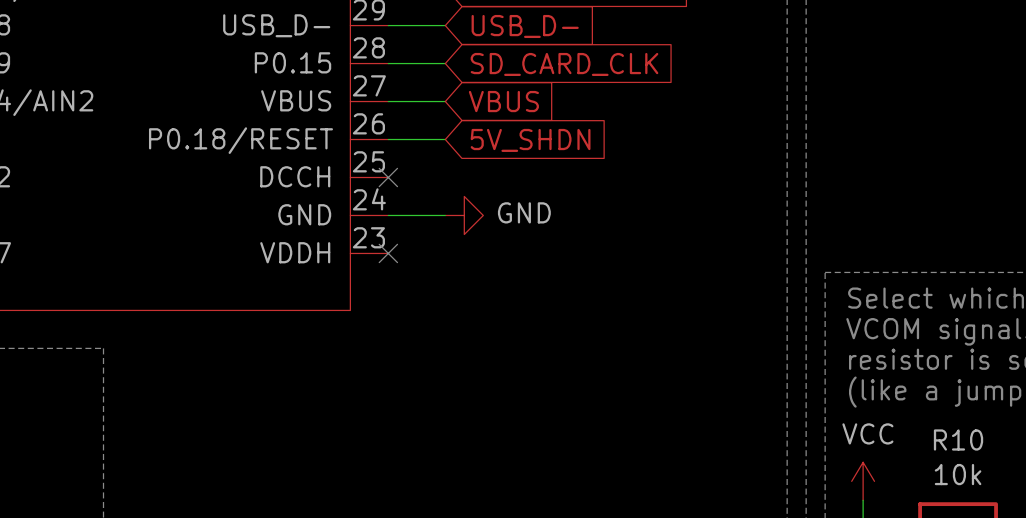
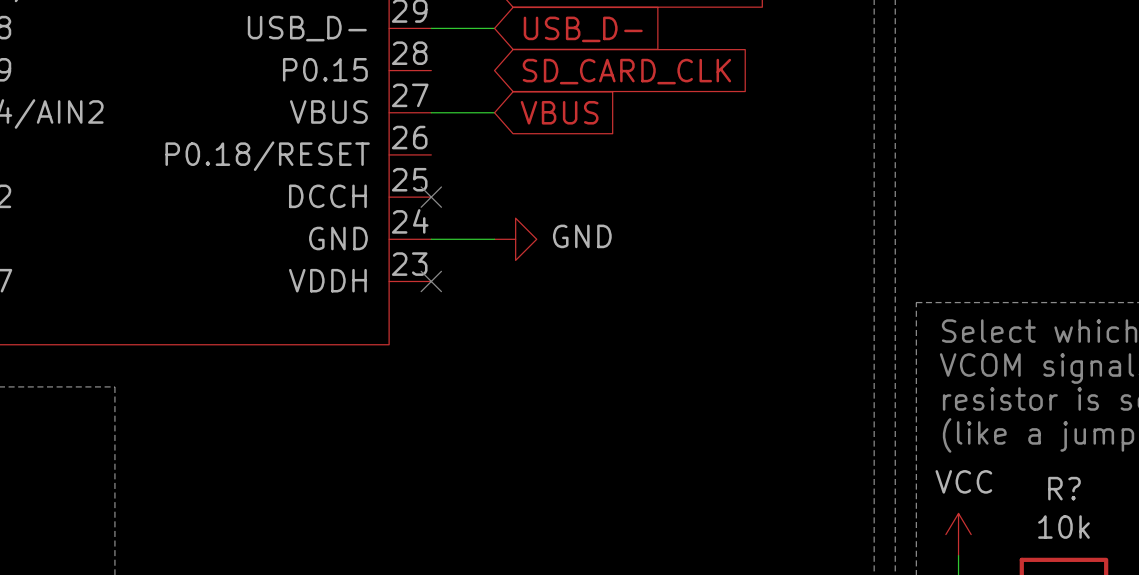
wire: (388, 63) (445, 63) -> none
wire: (388, 139) (445, 139) -> none
global label: 5V_SHDN (530, 140) -> none
R10 name: R10 (958, 439) -> R? (1064, 488)

